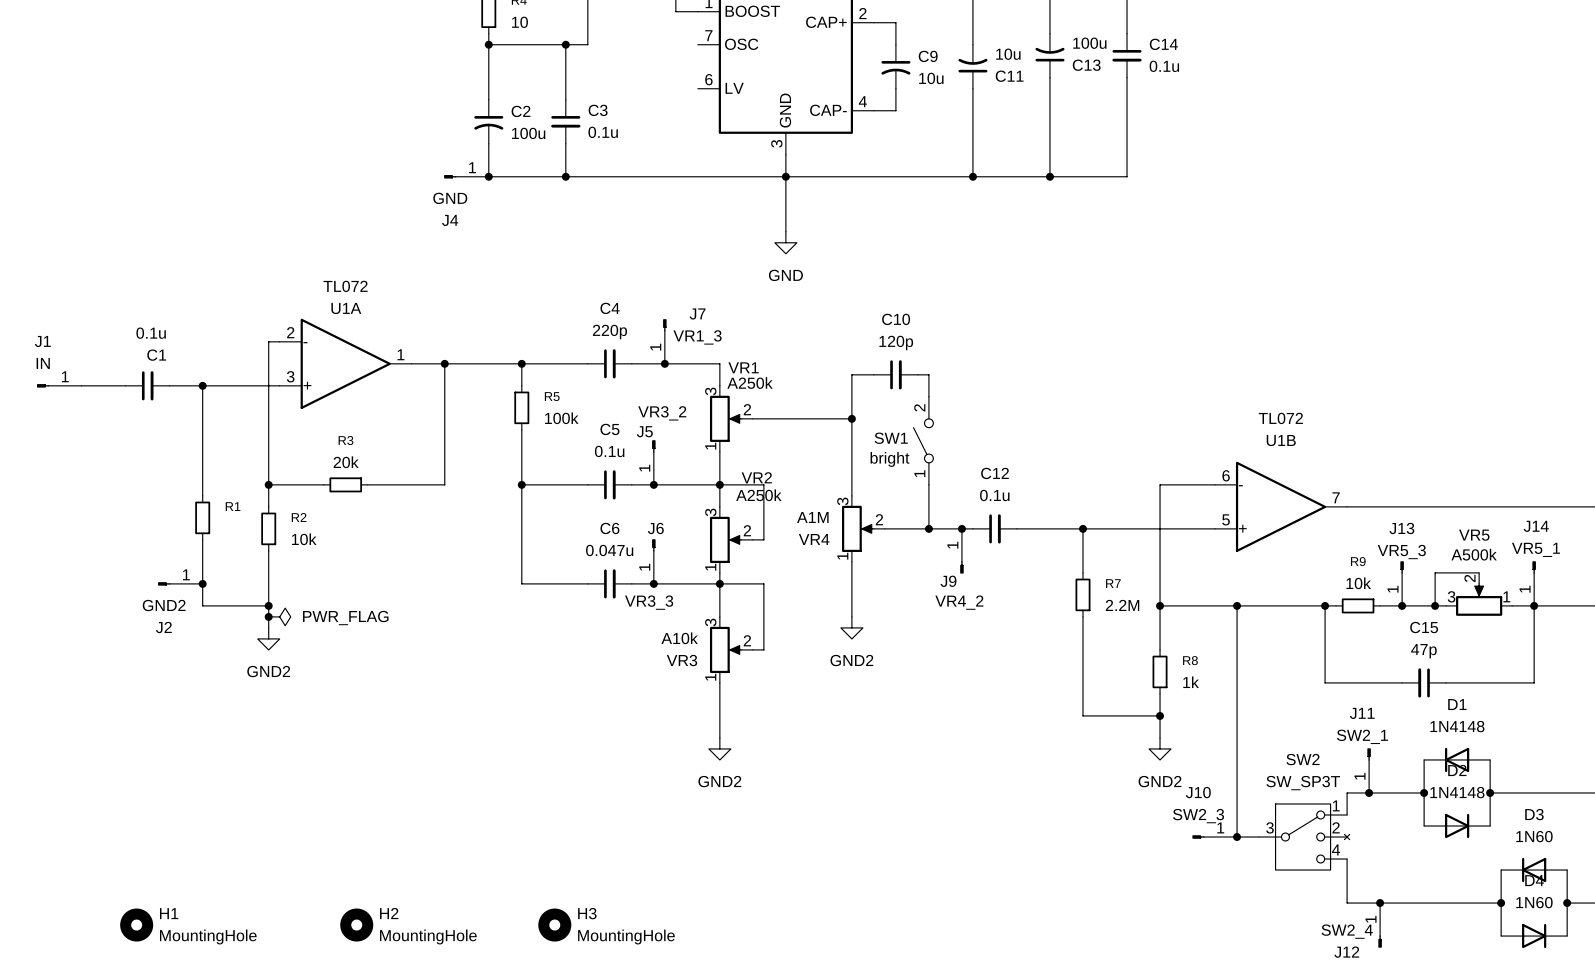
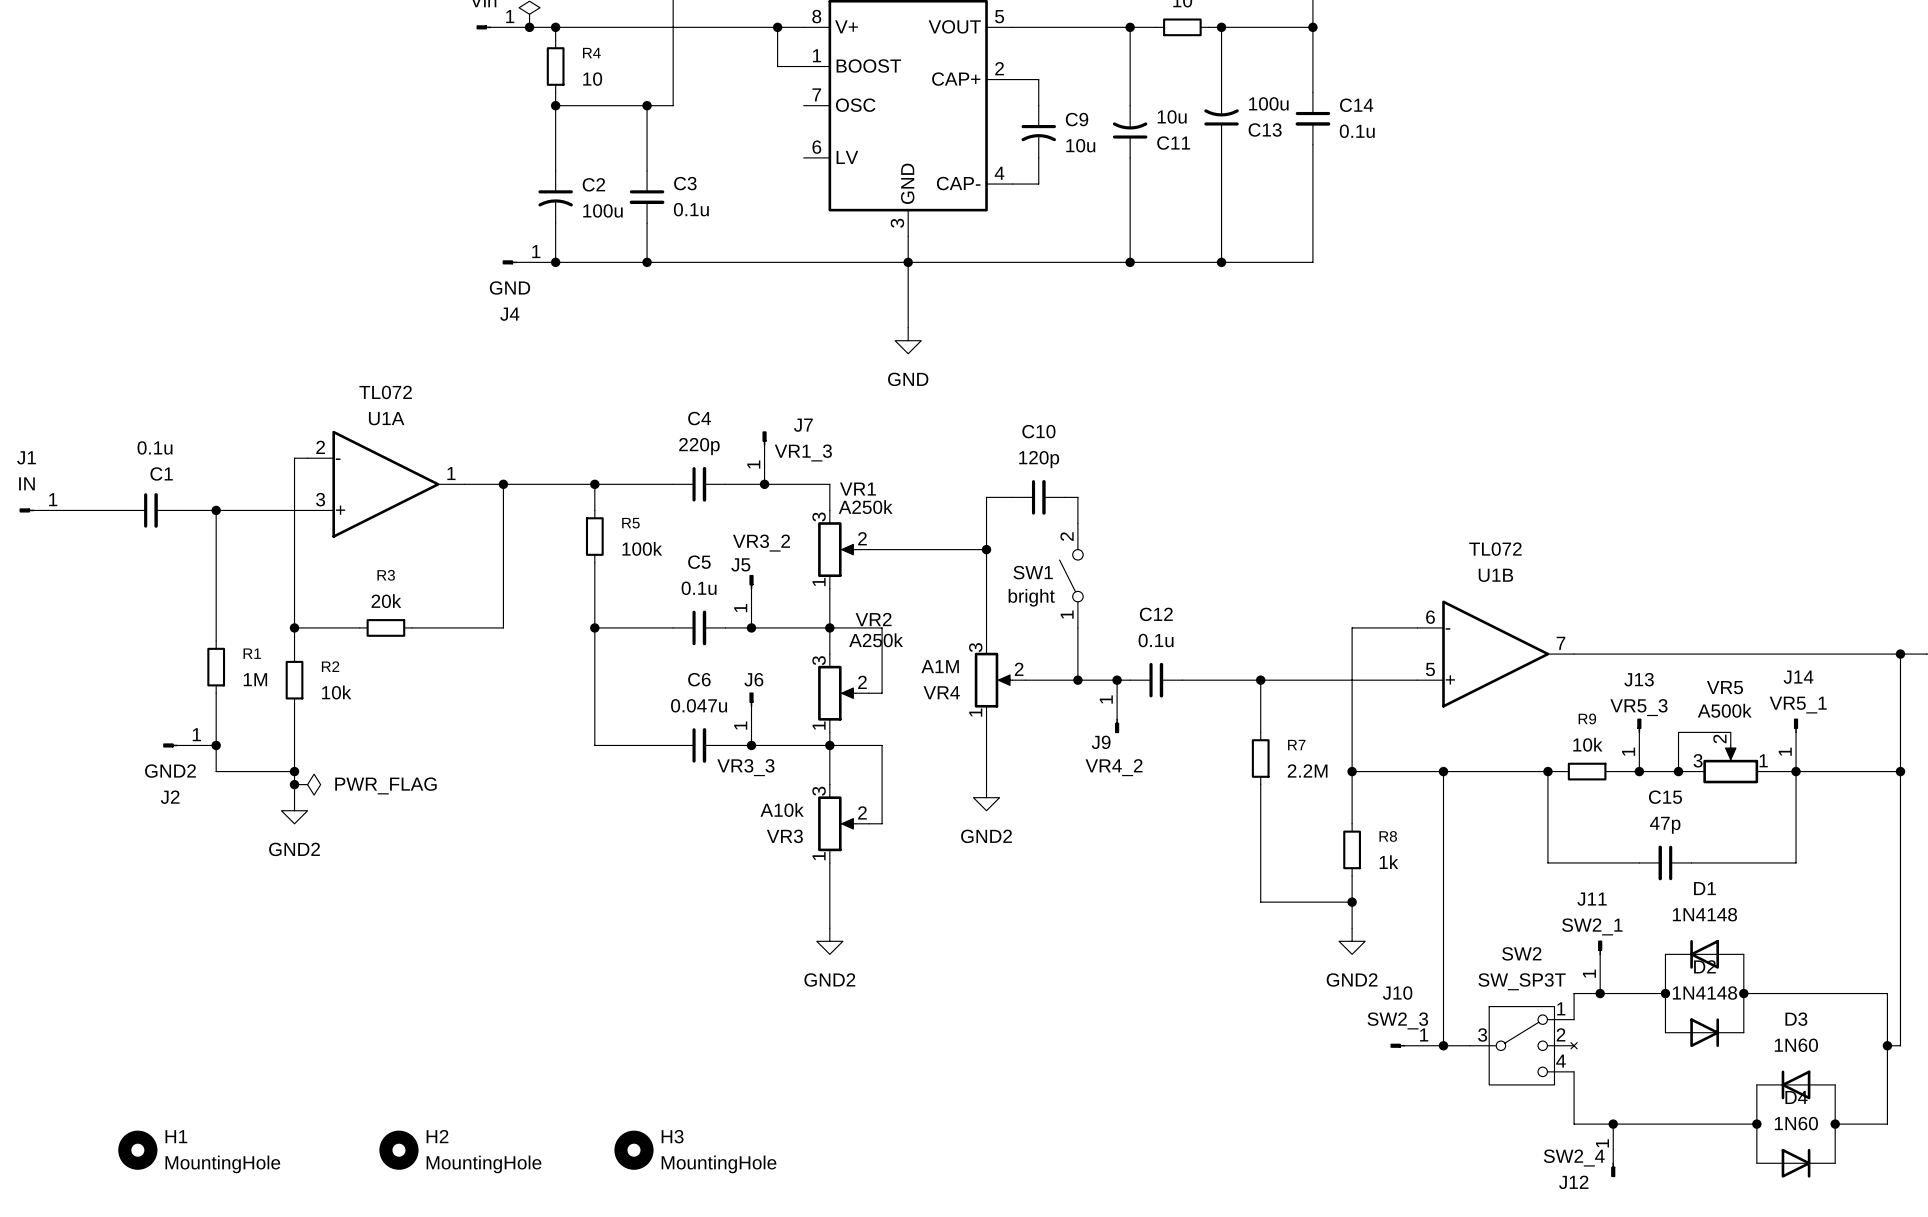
R1 value: none -> 1M (255, 679)

